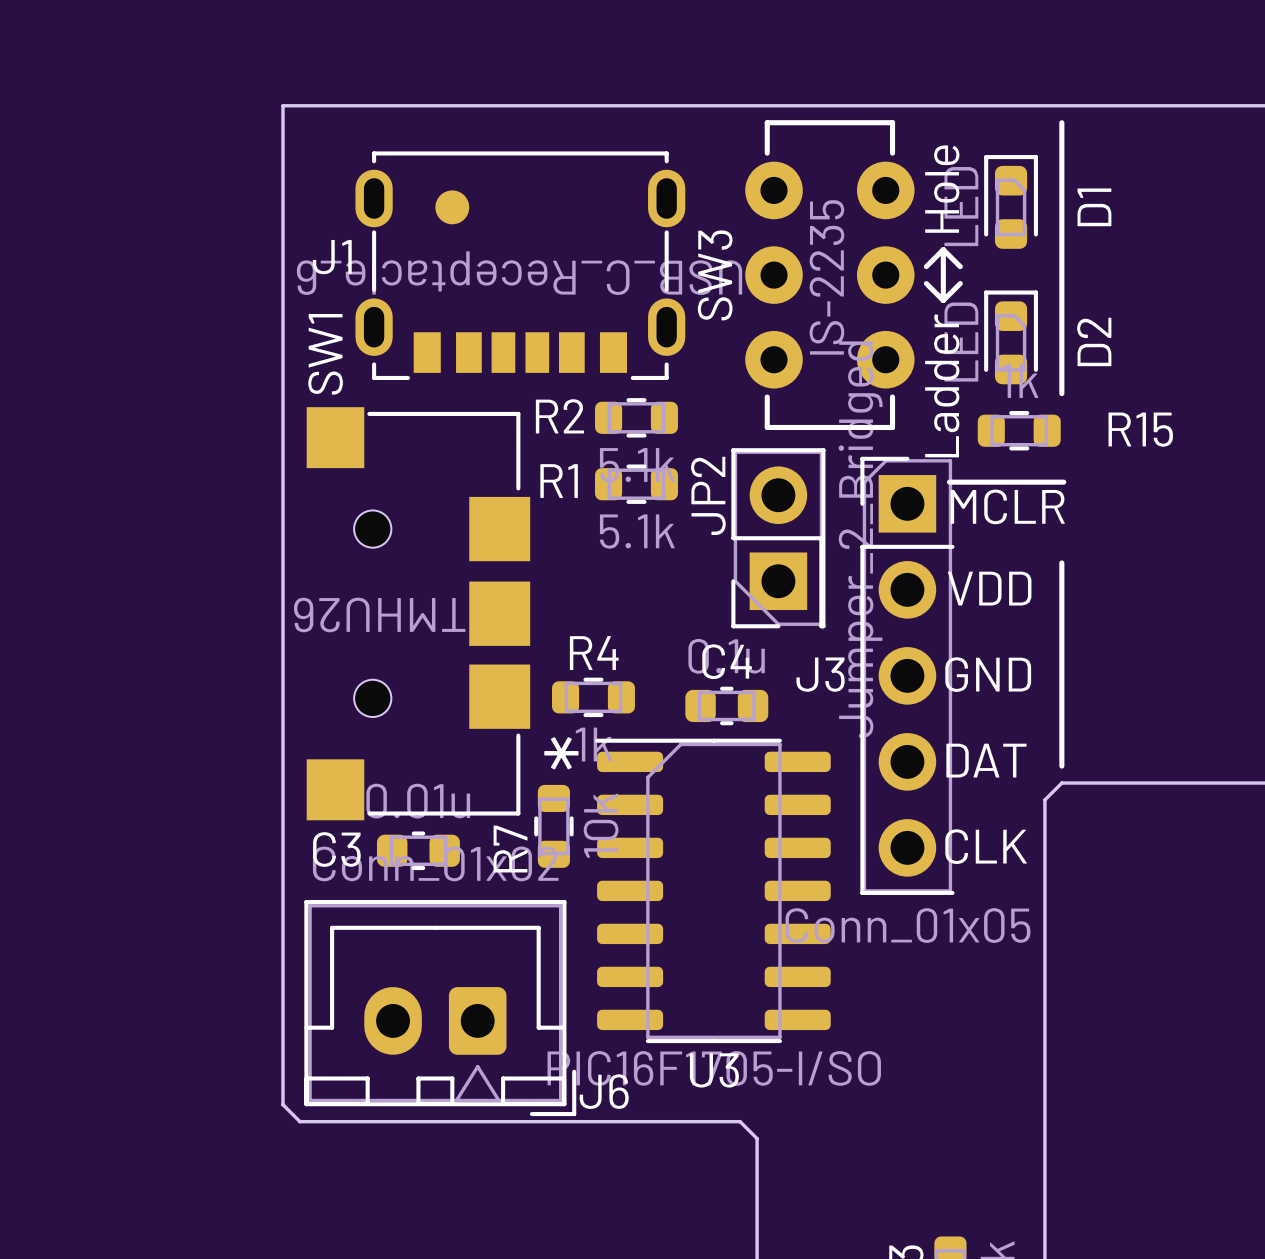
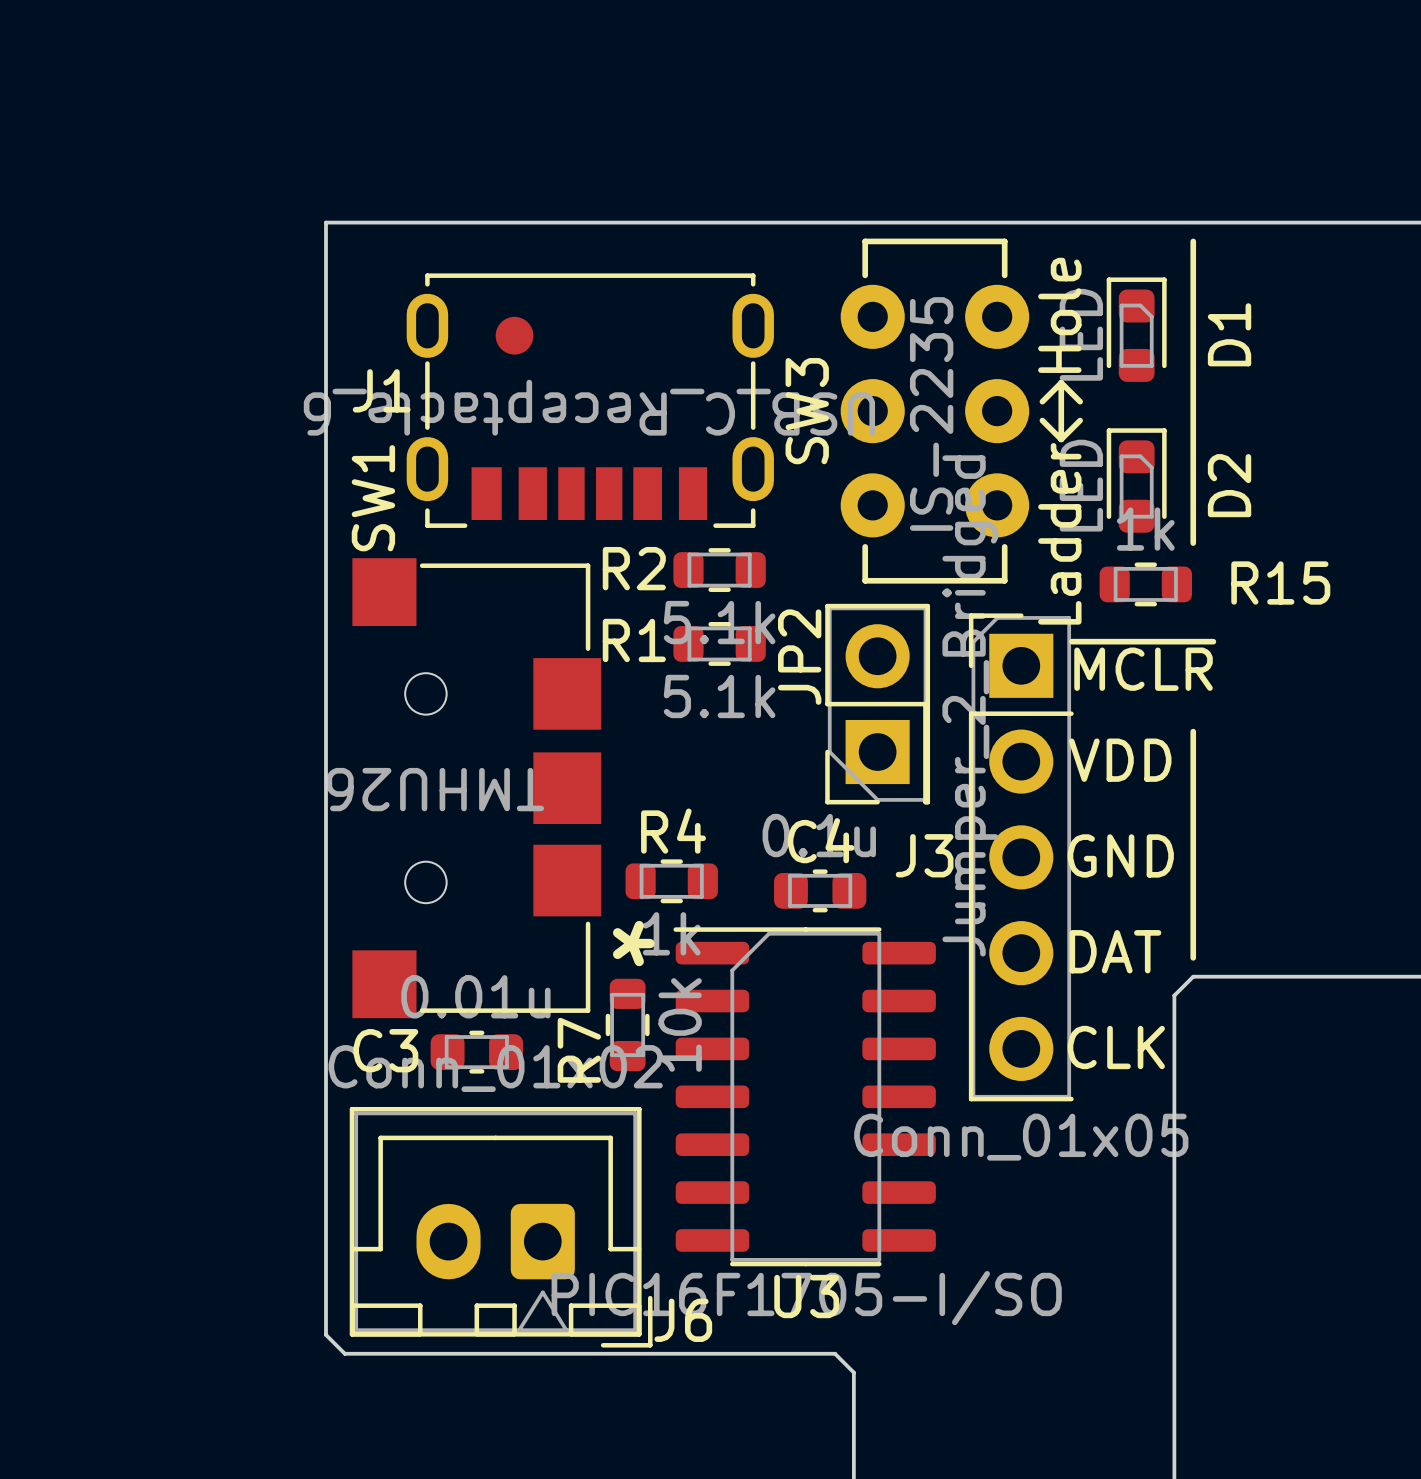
J1 footprint: [355, 151, 686, 381] -> [406, 273, 774, 528]

